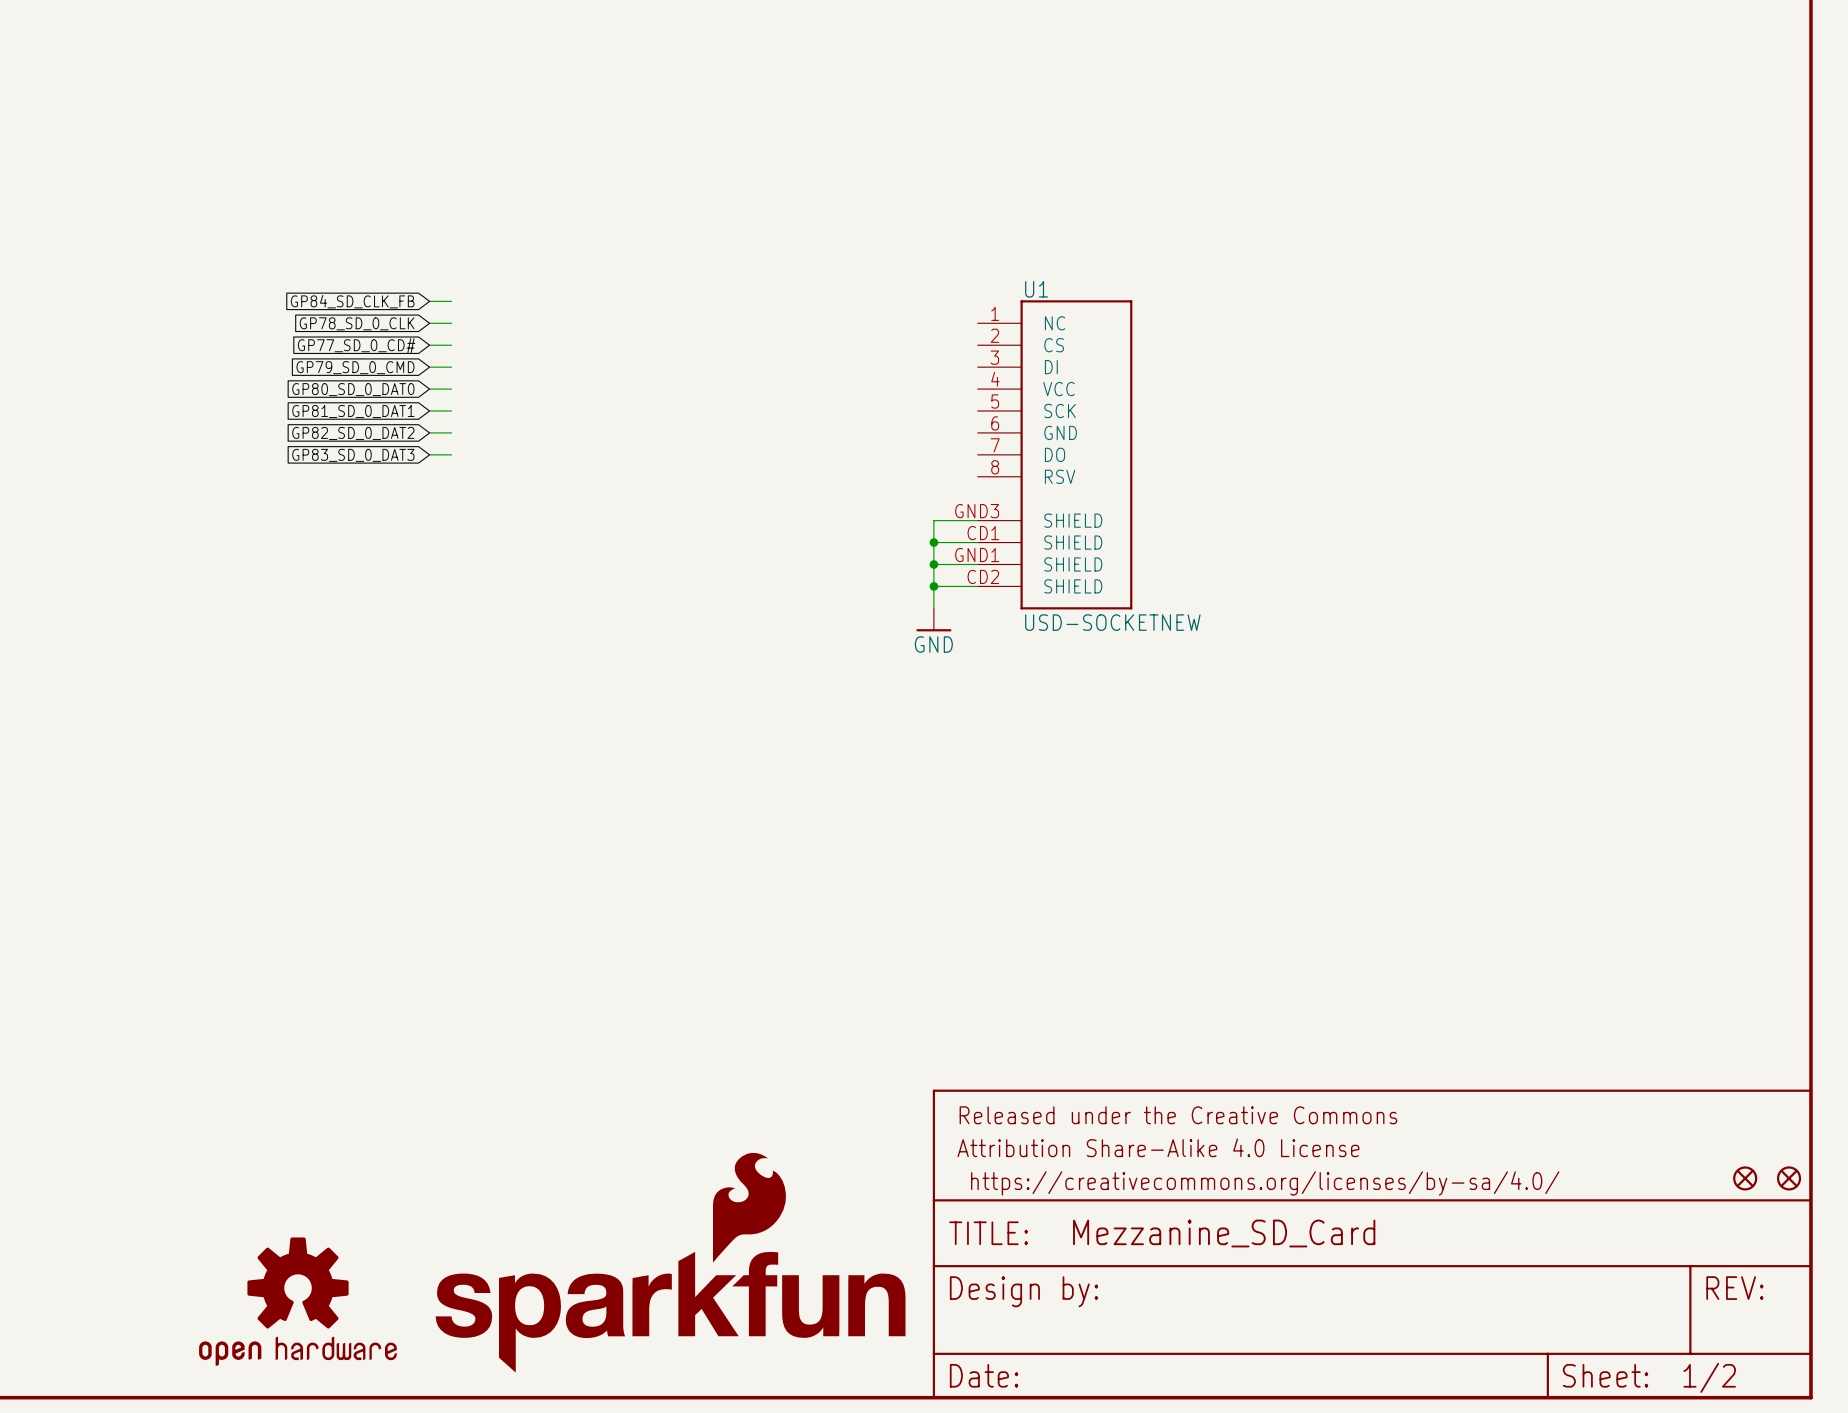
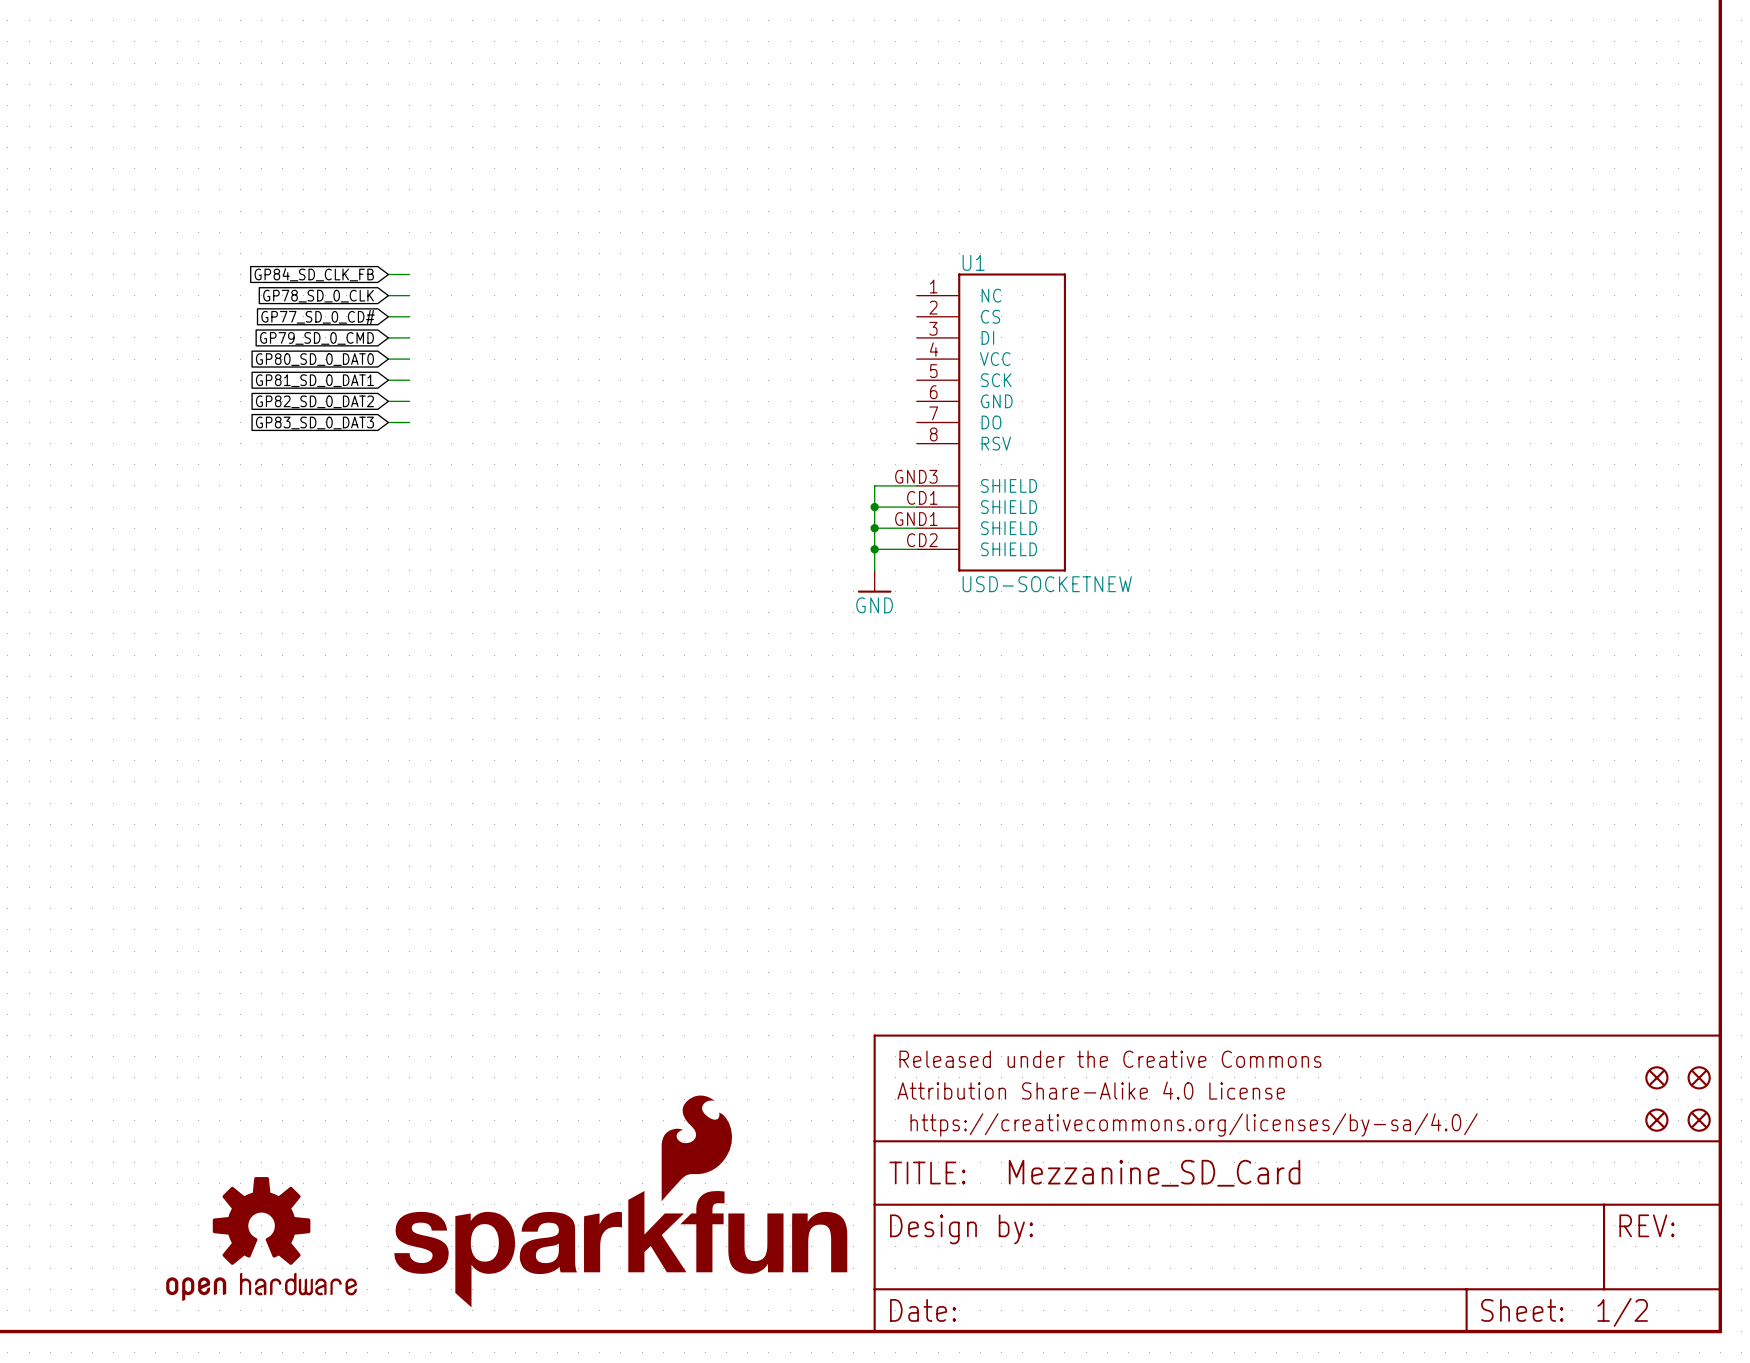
part: none -> (1656, 1077)
part: none -> (1699, 1077)

